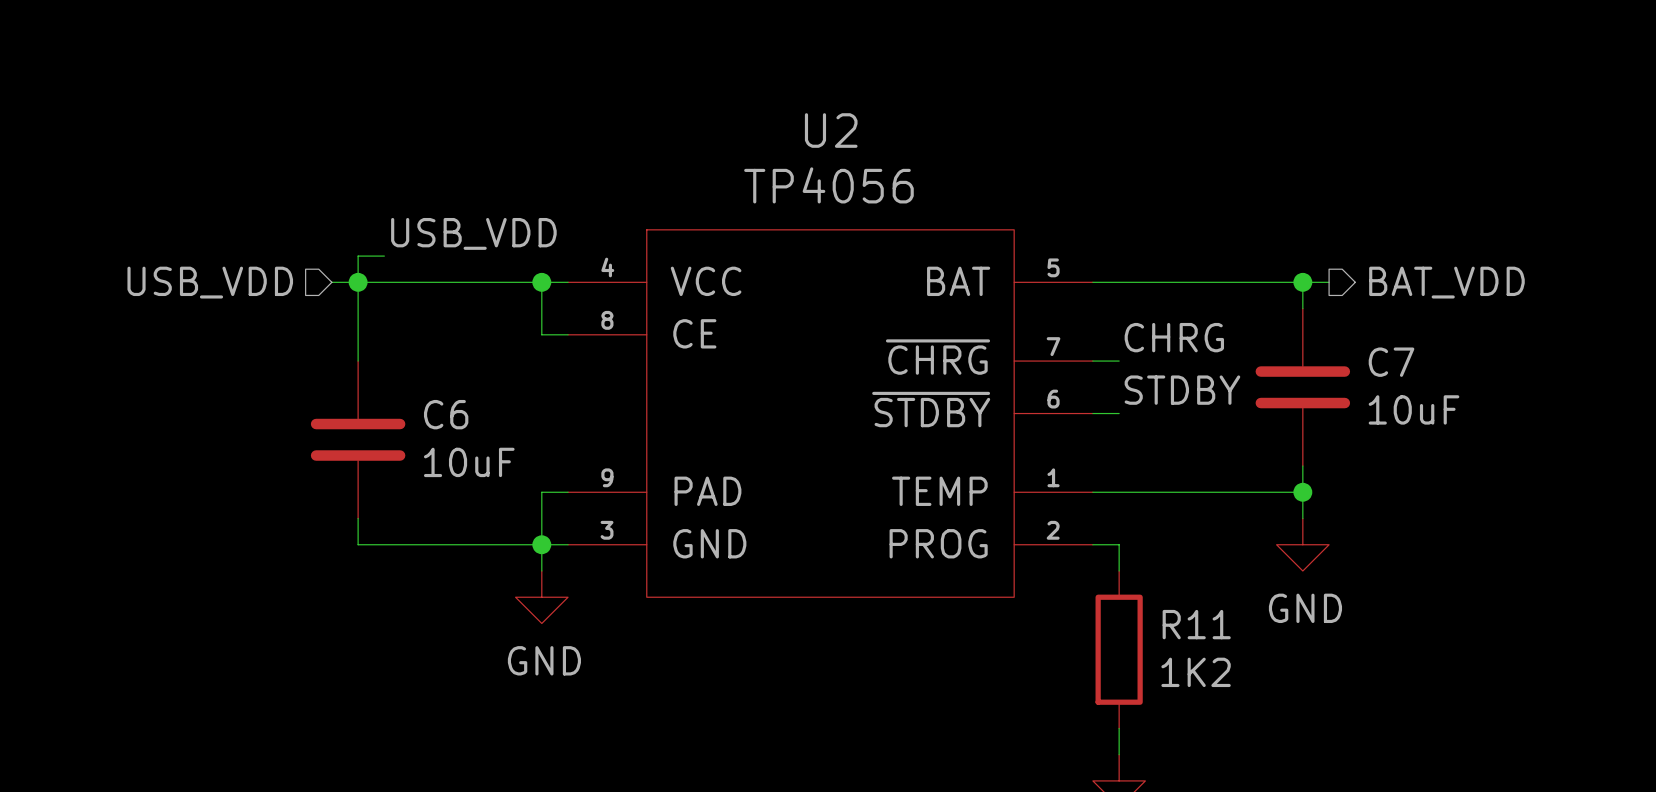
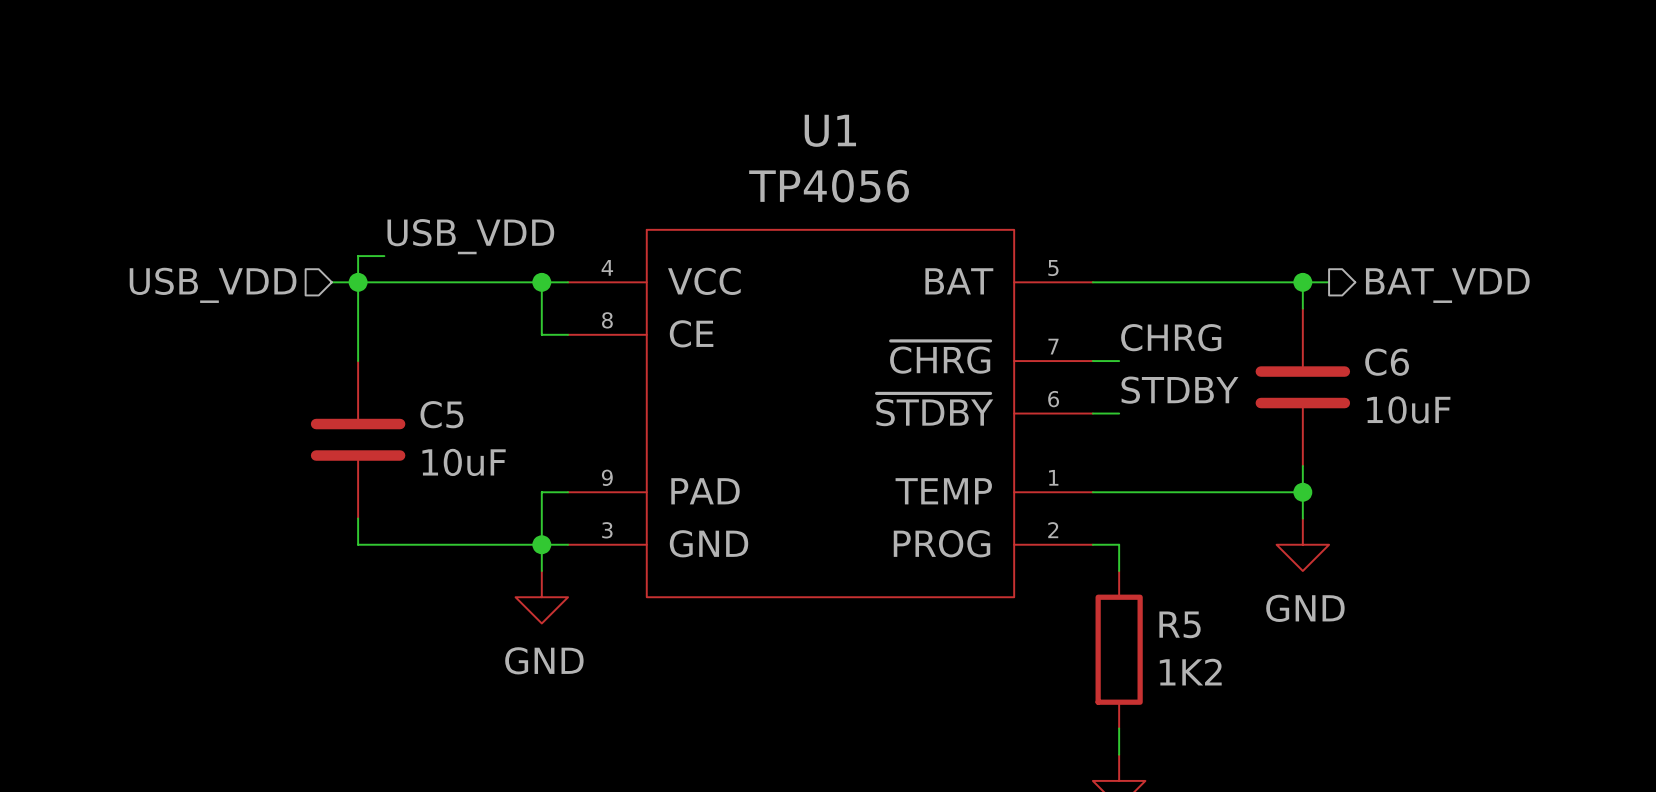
U2 name: U2 (831, 130) -> U1 (830, 130)
C7 name: C7 (1391, 362) -> C6 (1387, 362)
C6 name: C6 (446, 414) -> C5 (441, 414)
R11 name: R11 (1196, 624) -> R5 (1180, 624)

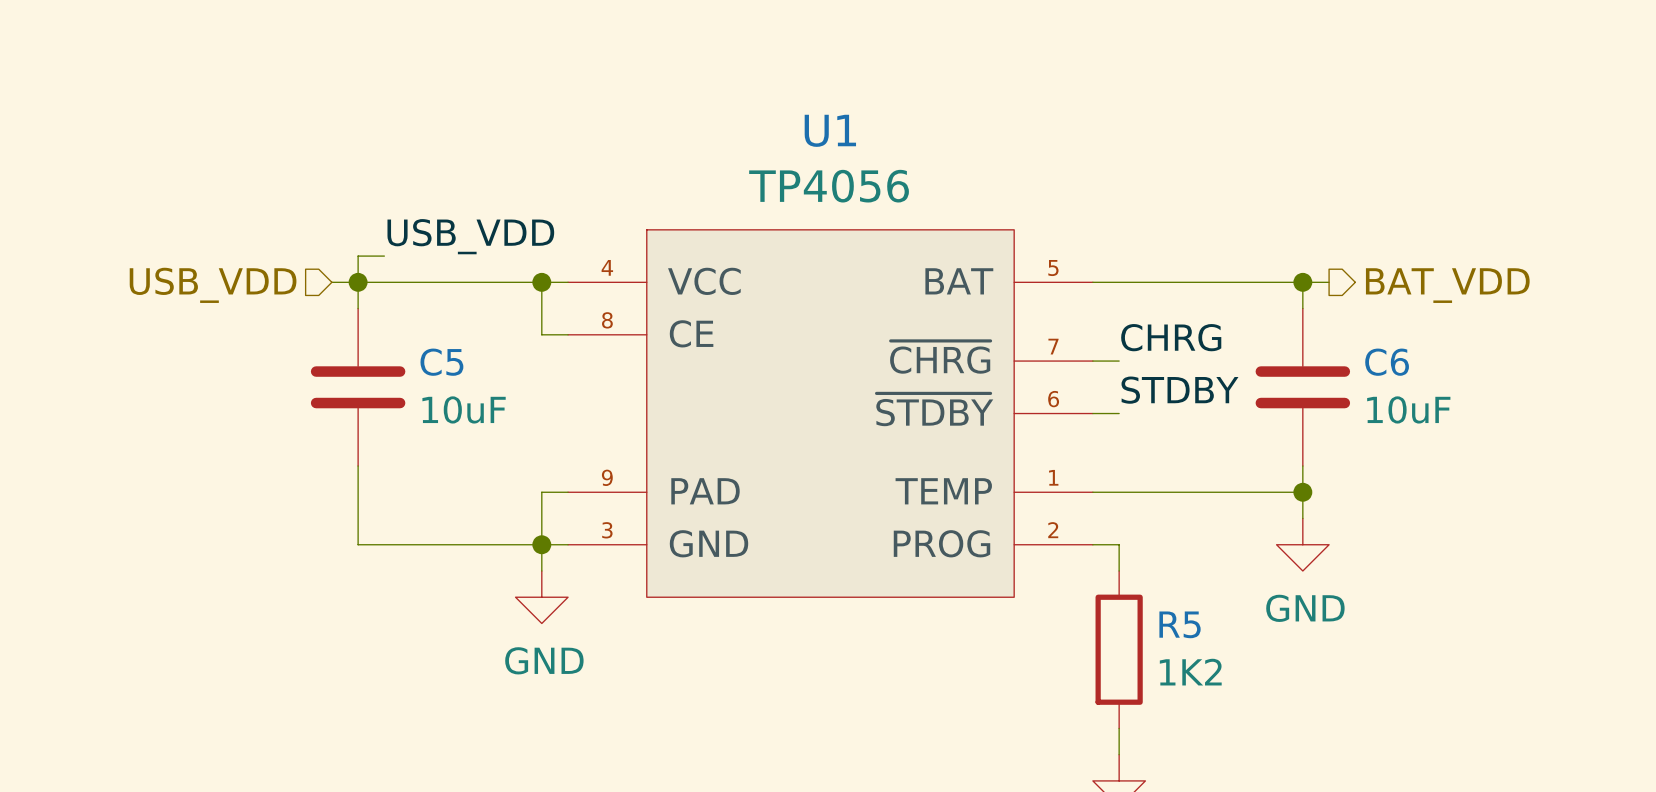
C5 position: (358, 439) -> (358, 387)

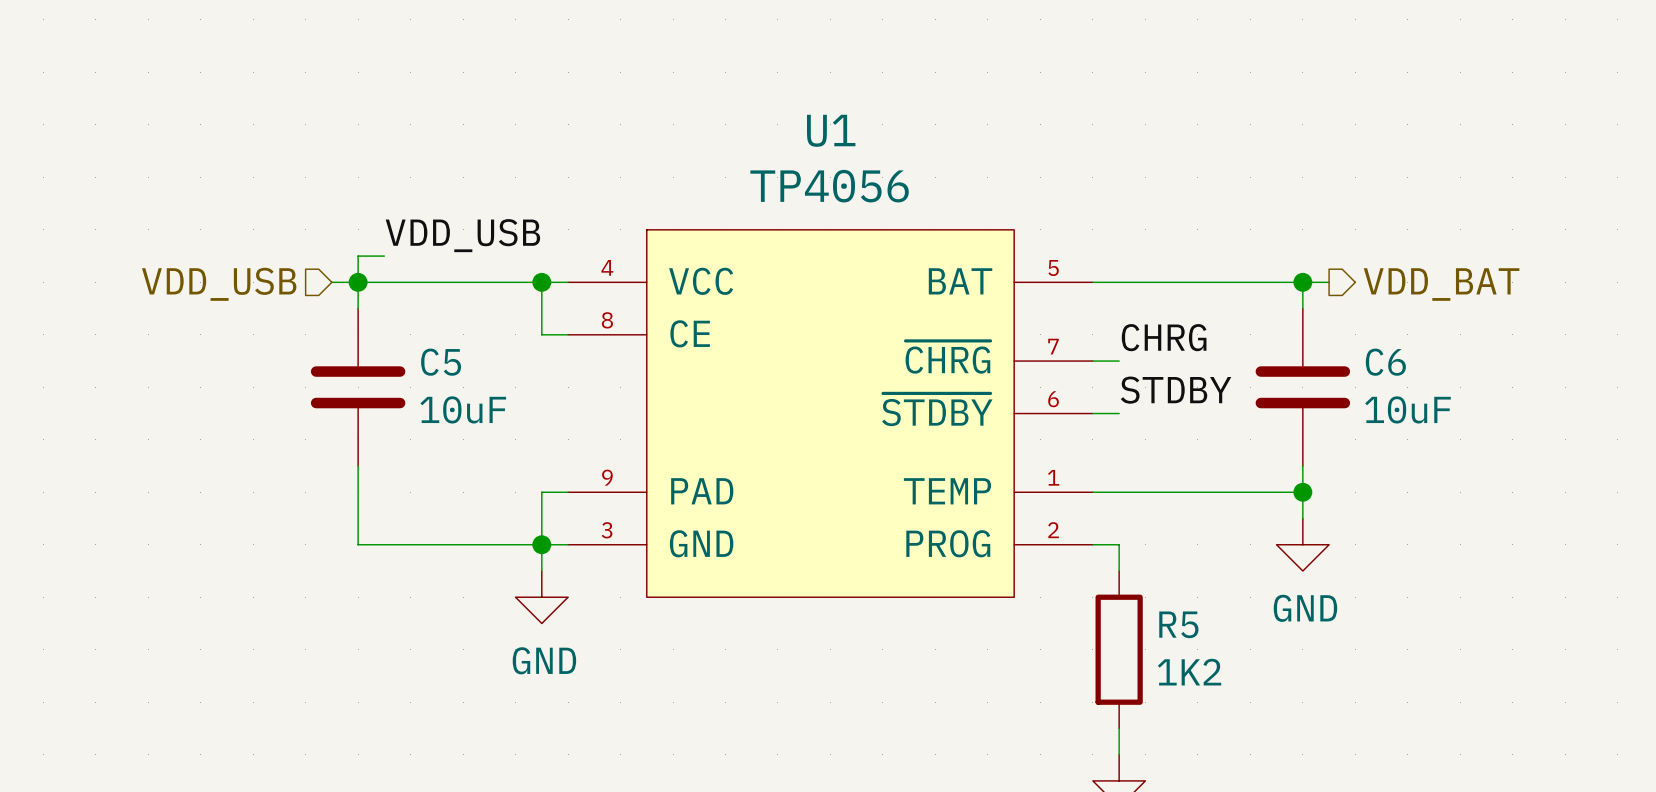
label: USB_VDD (470, 236) -> VDD_USB (462, 235)
hierarchical label: USB_VDD (213, 285) -> VDD_USB (219, 284)
hierarchical label: BAT_VDD (1447, 285) -> VDD_BAT (1441, 284)

